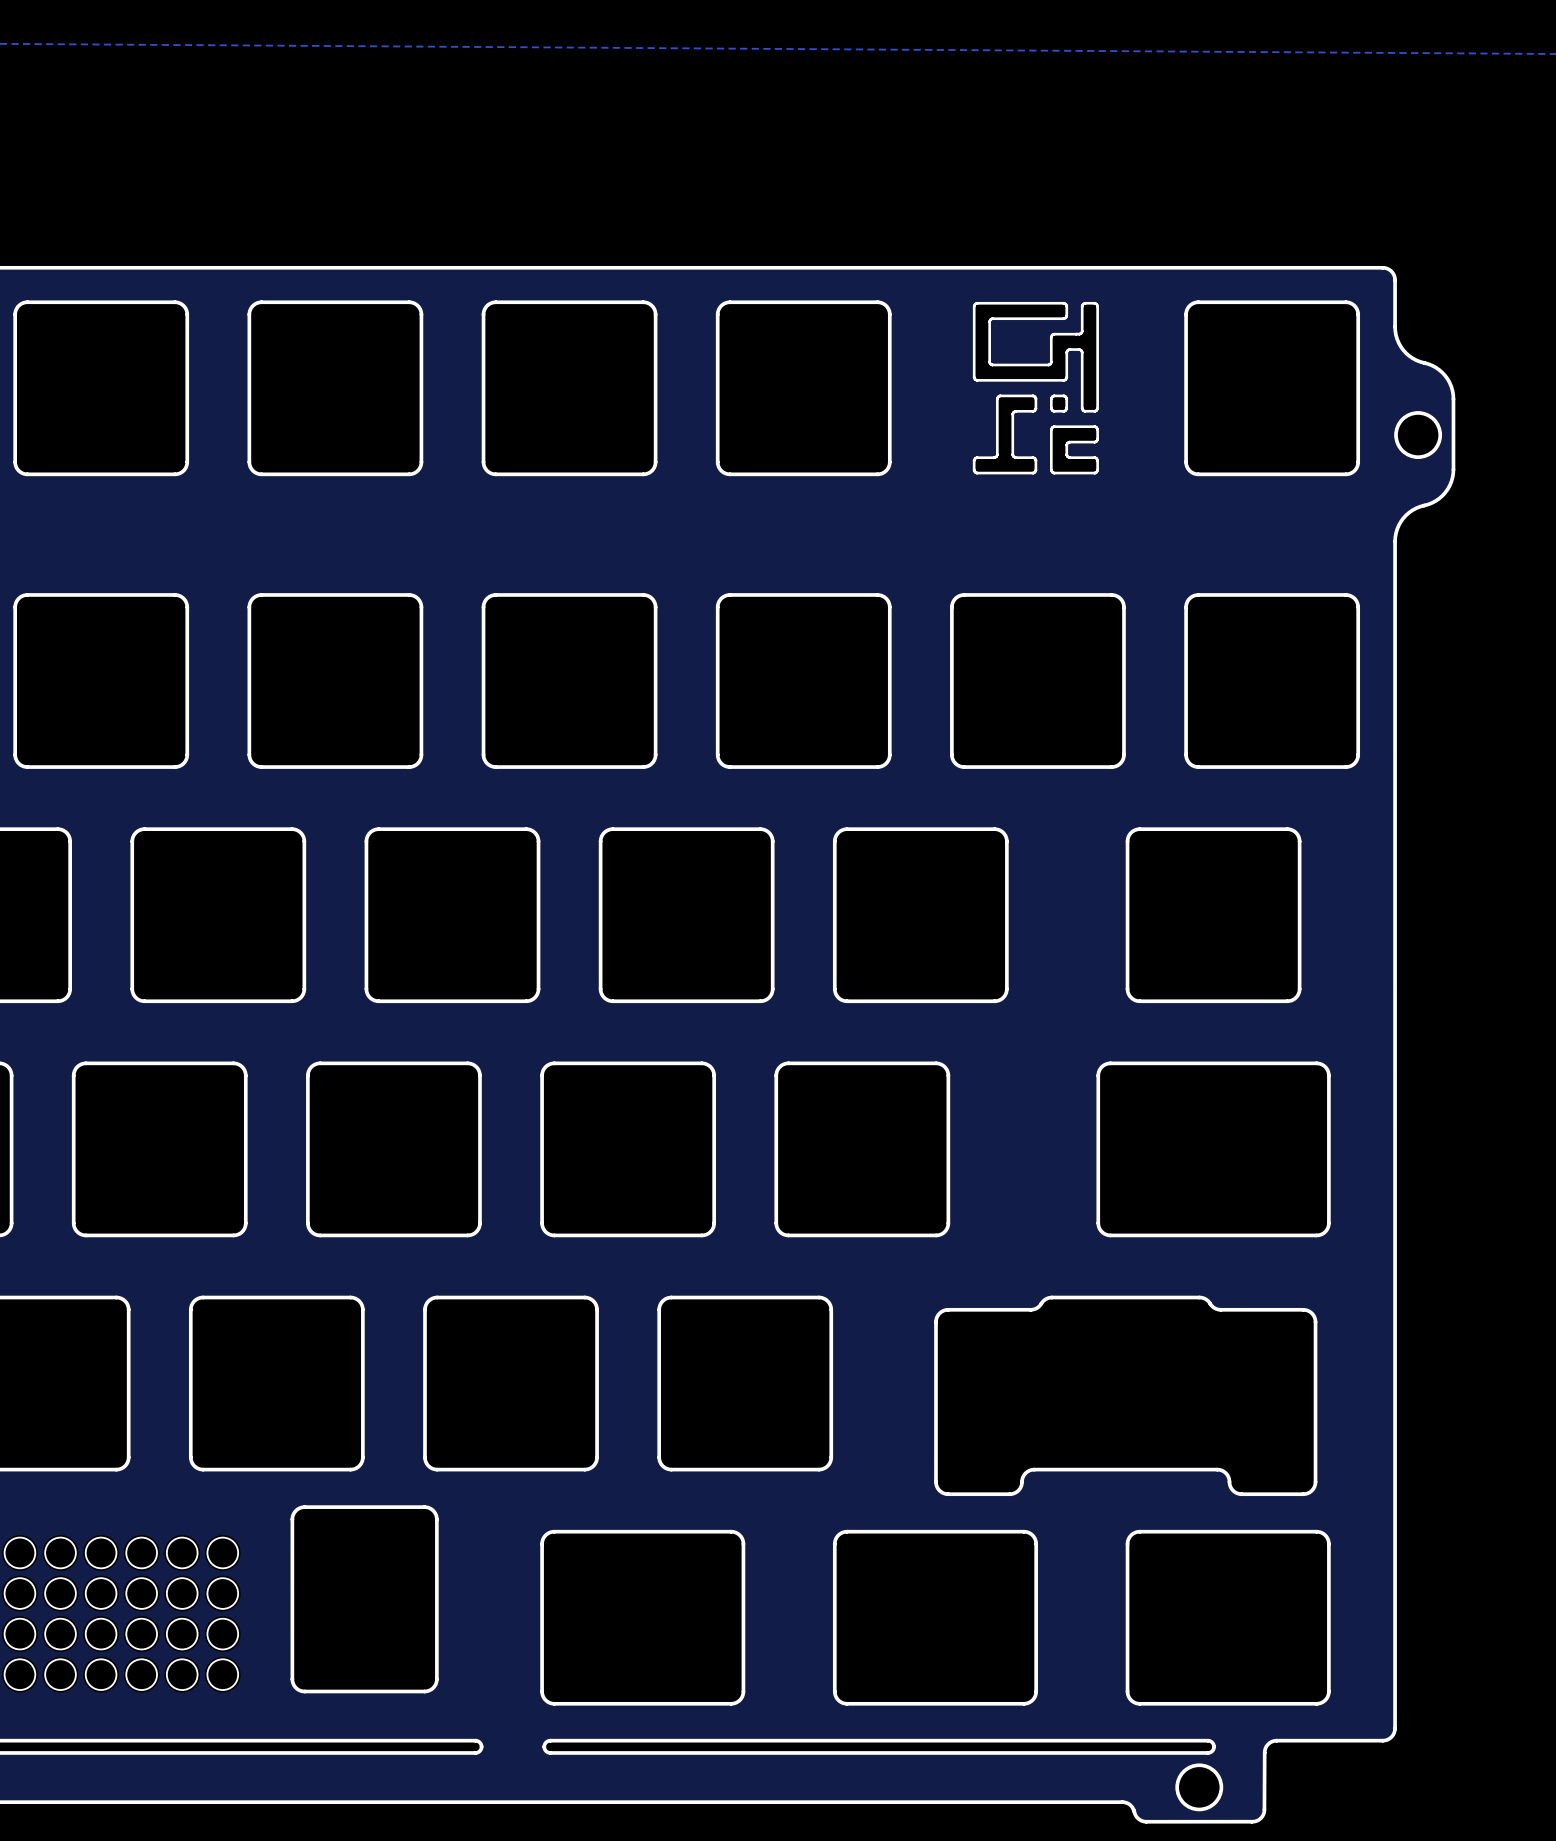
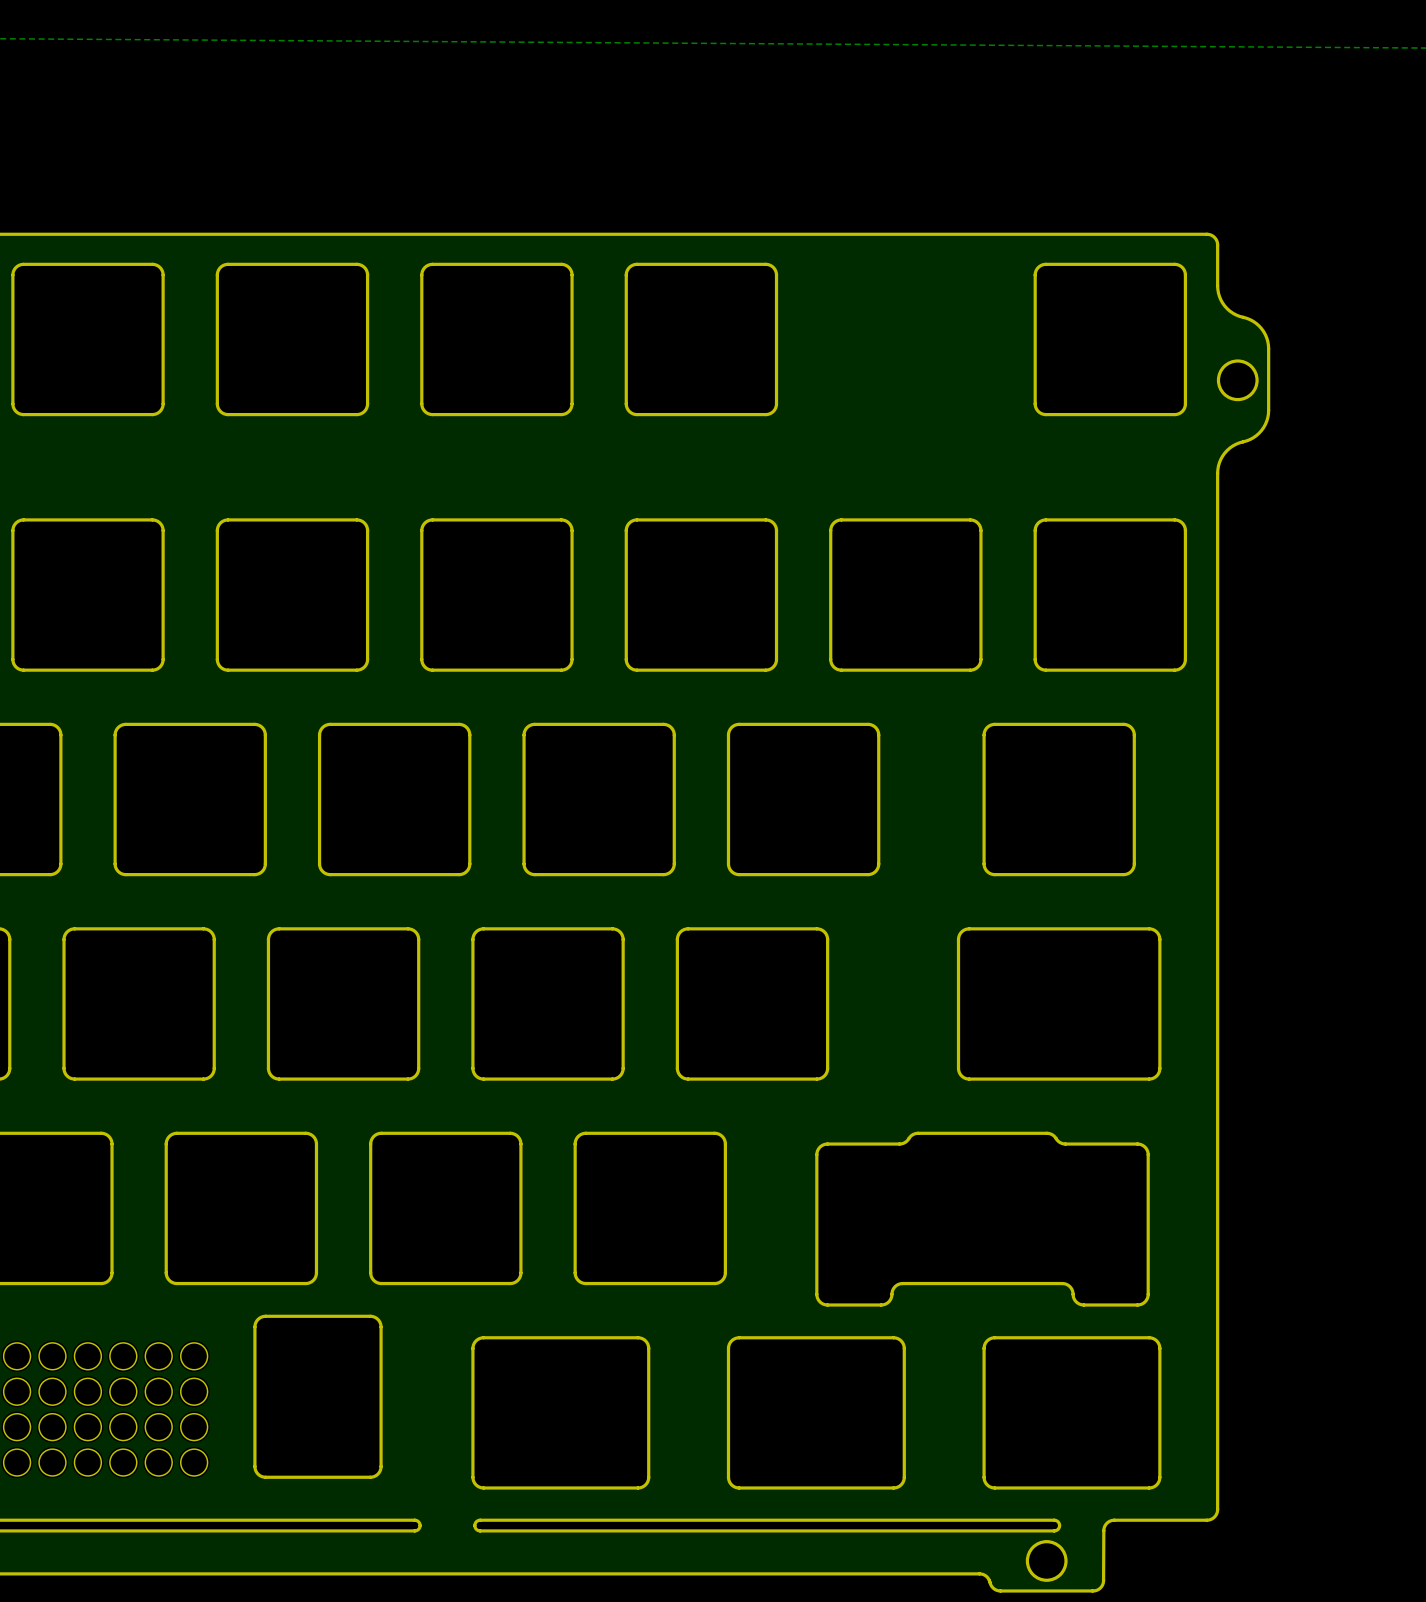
board edge: (1095, 303) (1084, 303) (1082, 305) (1081, 333) (1052, 335) (1051, 362) (1048, 364) (990, 364) (989, 321) (992, 318) (1064, 318) (1066, 316) (1065, 304) (975, 304) (975, 379) (1064, 380) (1066, 377) (1066, 352) (1069, 349) (1079, 349) (1082, 352) (1082, 408) (1084, 411) (1096, 410) (1097, 305) (1095, 303) -> none
board edge: (1033, 395) (998, 396) (997, 455) (994, 457) (975, 458) (975, 472) (1034, 472) (1034, 458) (1015, 457) (1012, 454) (1012, 413) (1015, 411) (1035, 410) (1035, 398) (1033, 395) -> none
board edge: (1064, 395) (1052, 396) (1052, 410) (1065, 410) (1066, 398) (1064, 395) -> none
board edge: (1095, 426) (1052, 427) (1052, 472) (1096, 472) (1096, 458) (1069, 457) (1066, 455) (1066, 444) (1069, 442) (1096, 441) (1097, 429) (1095, 426) -> none

